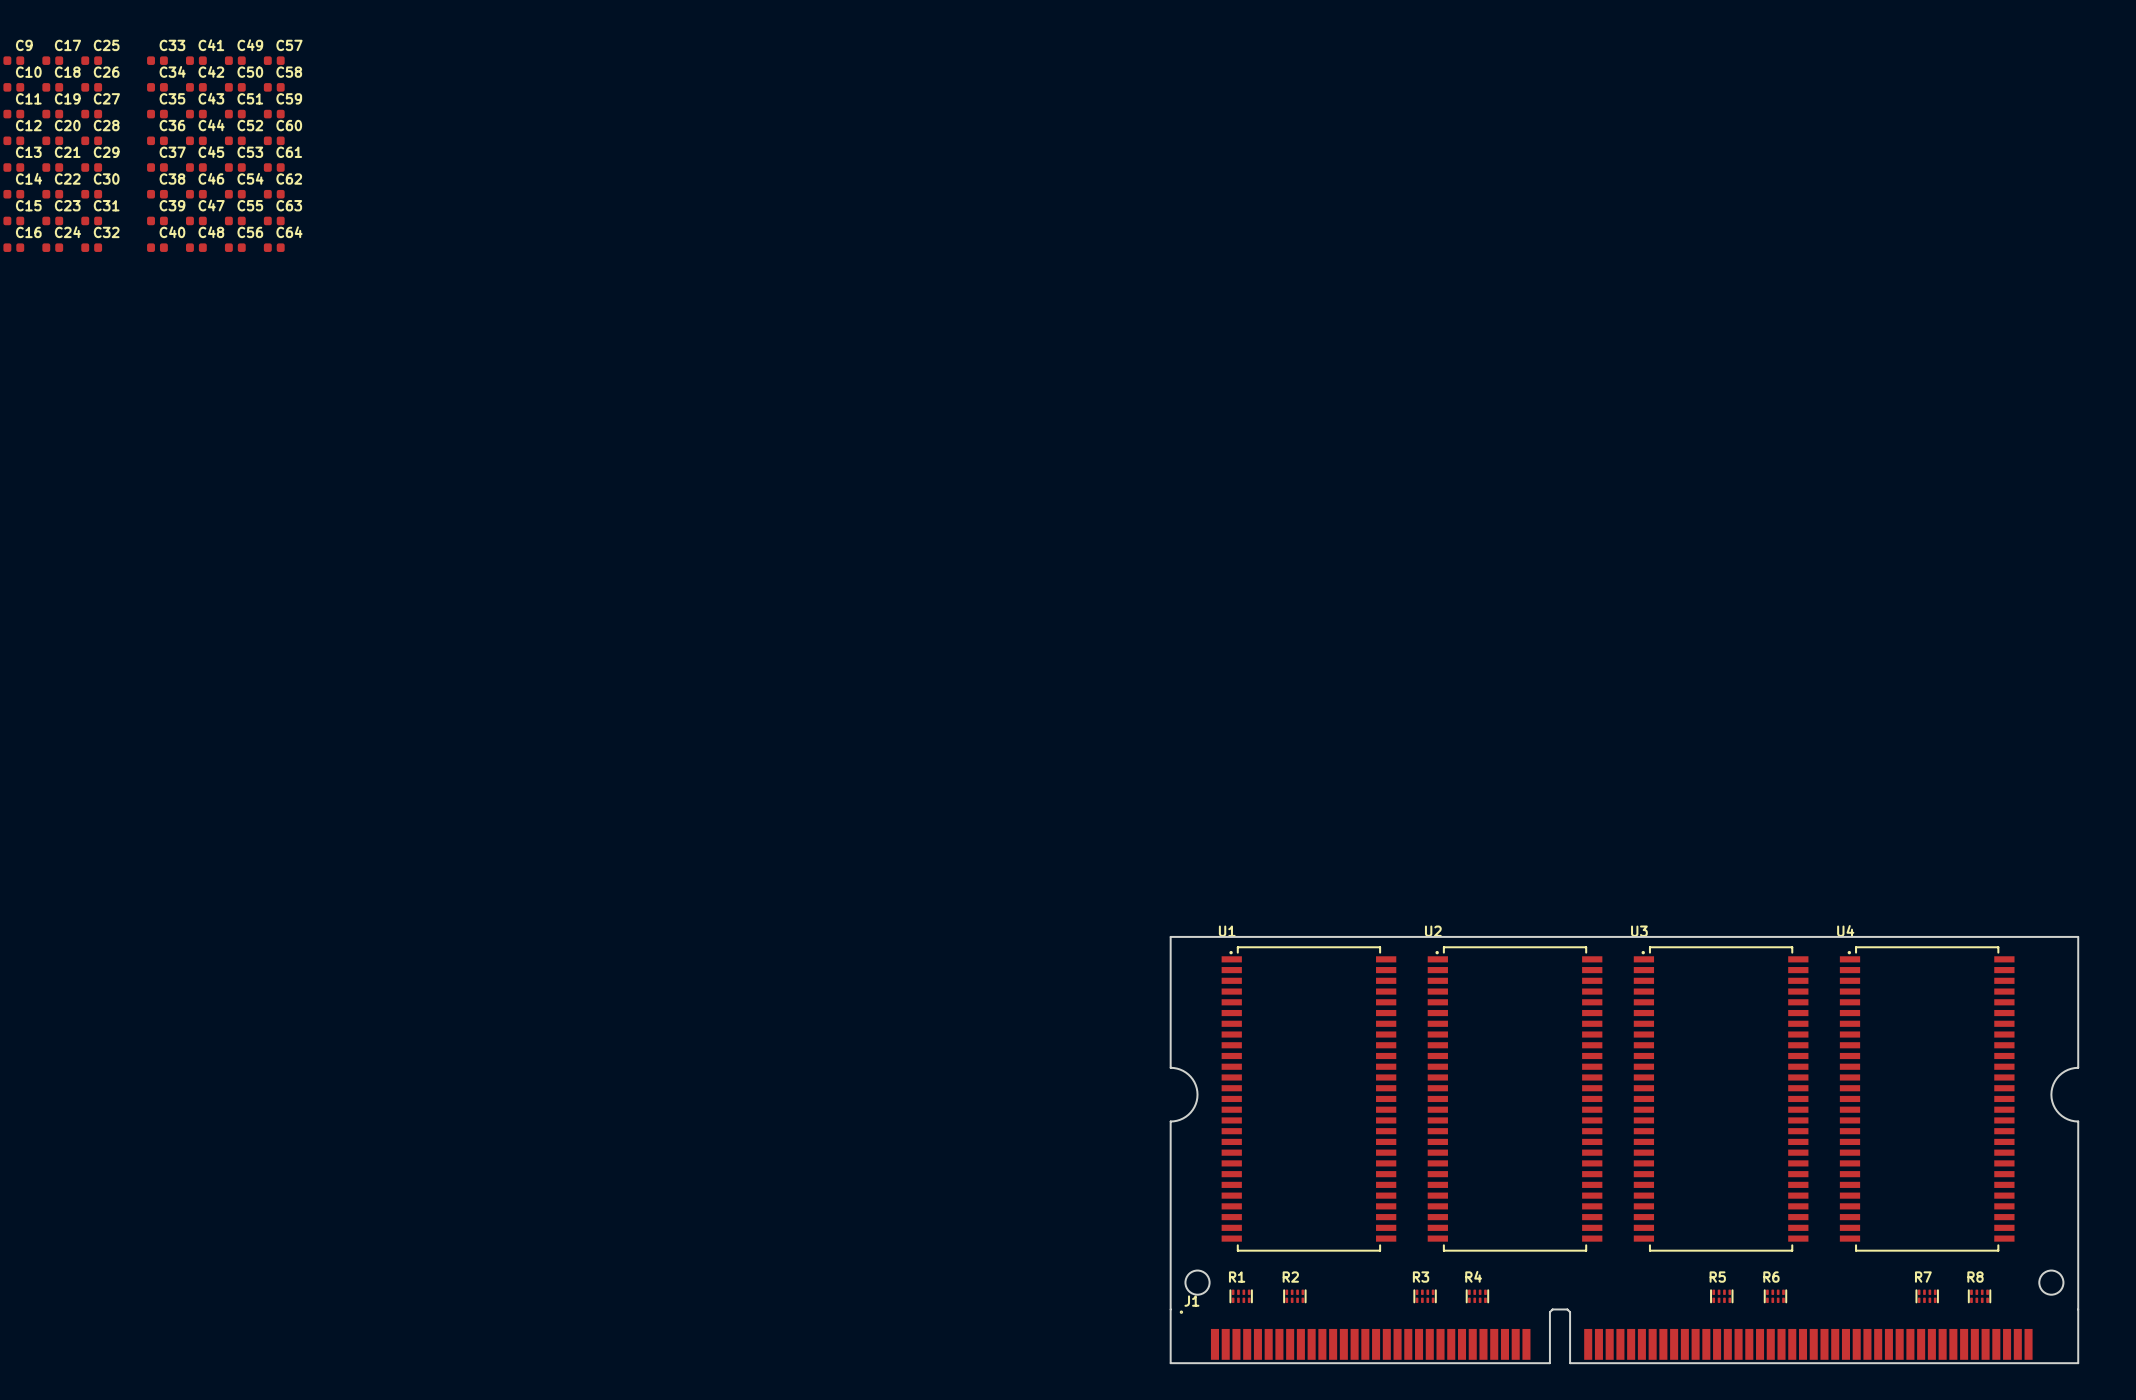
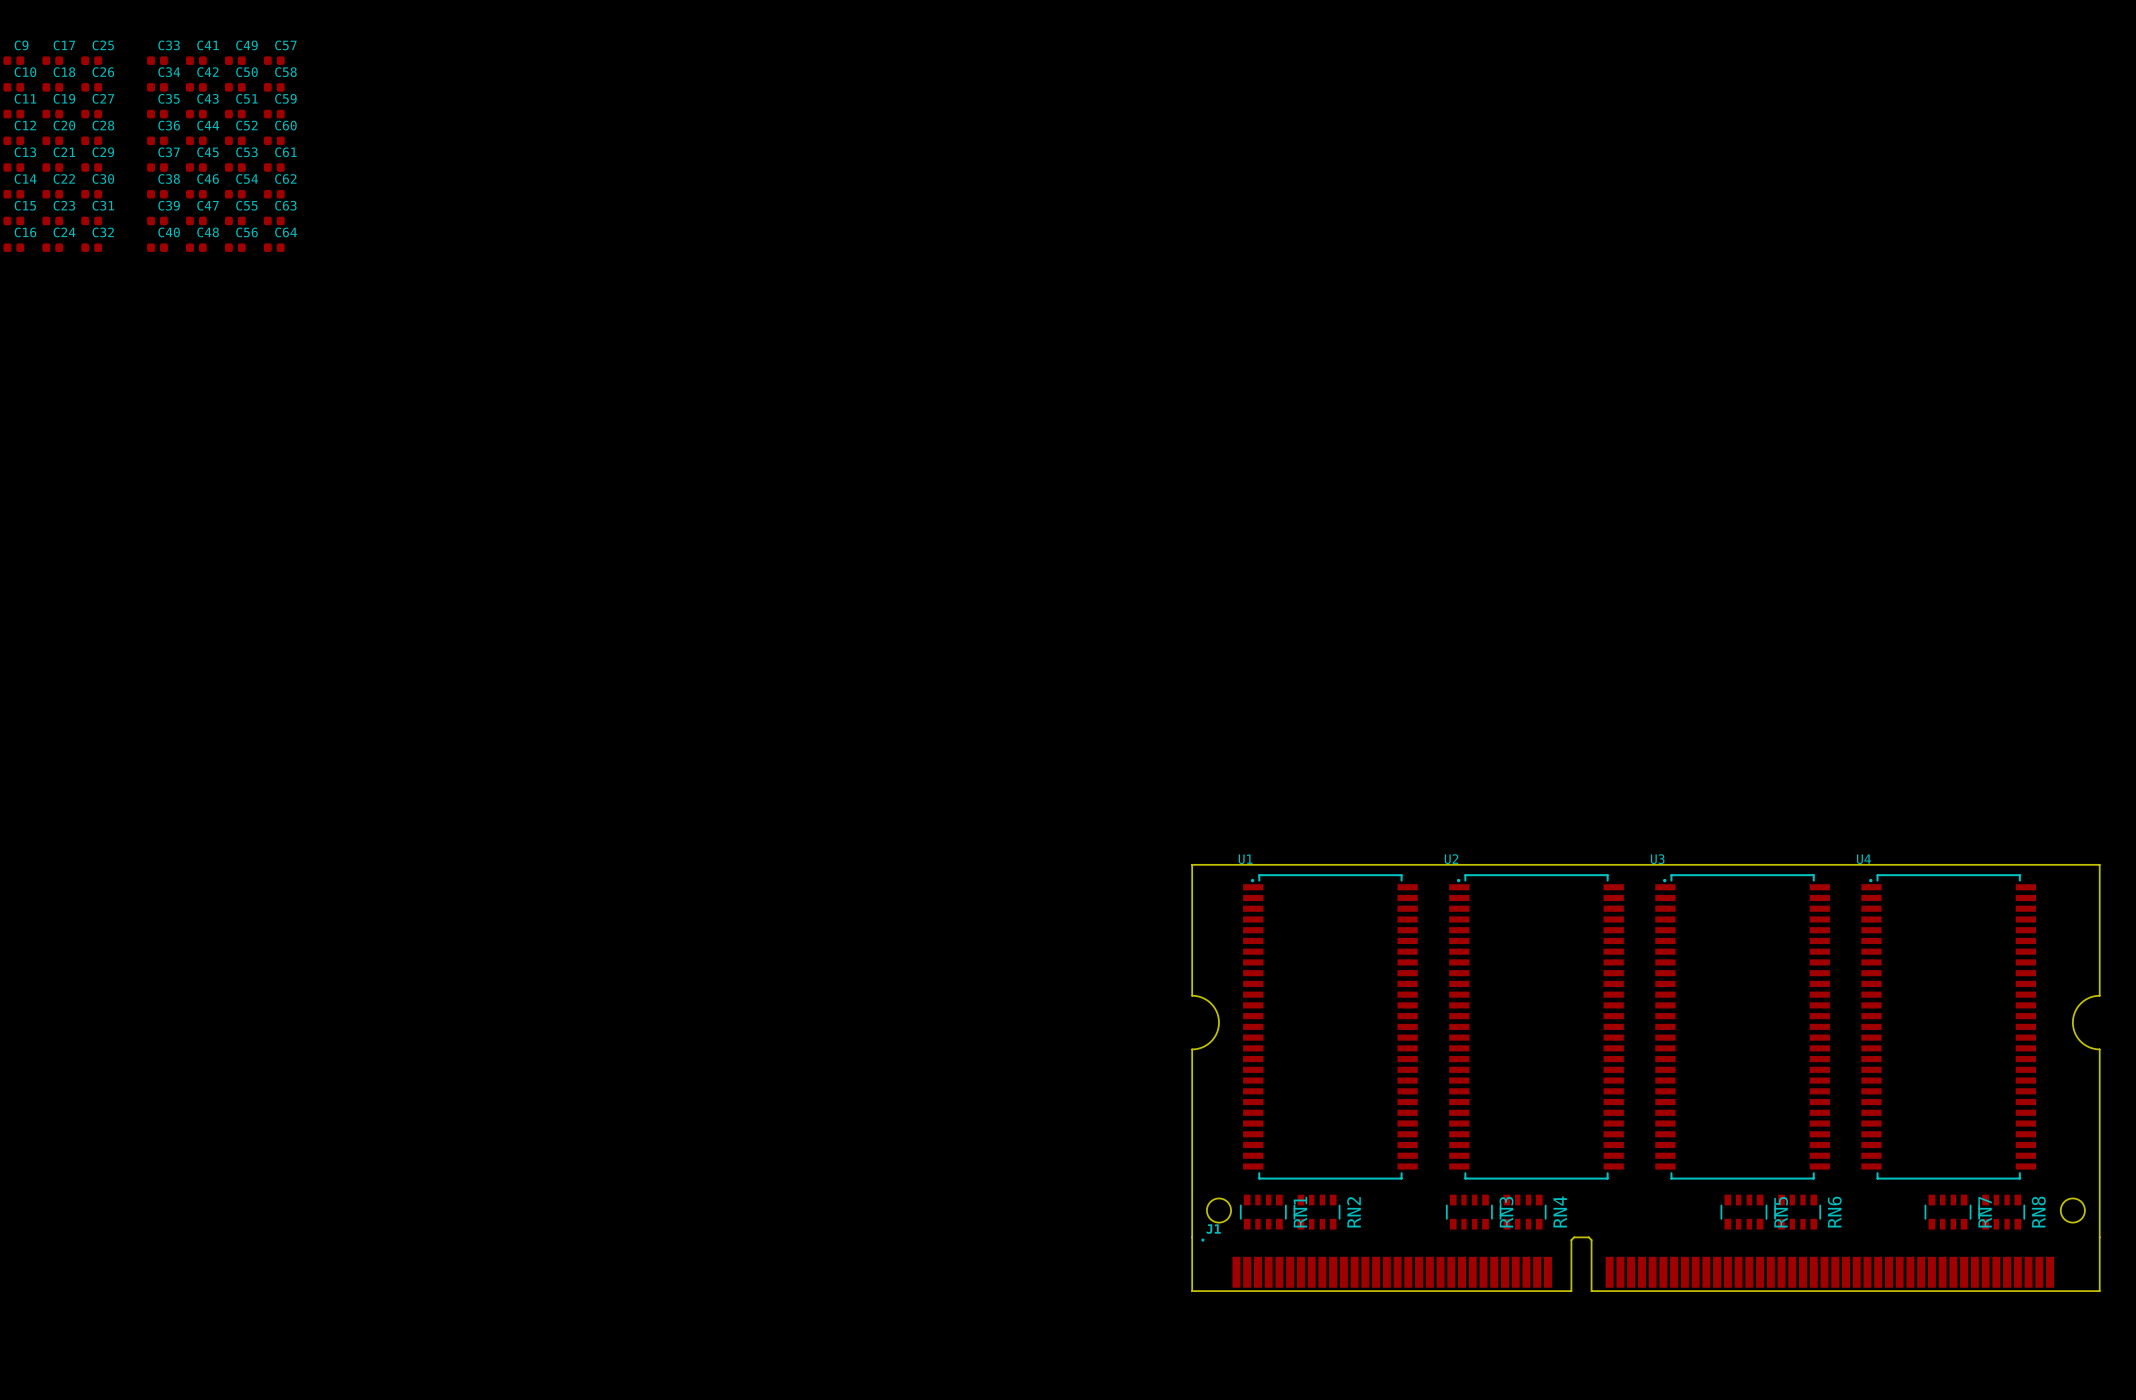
U1 position: (1308, 1098) -> (1330, 1026)
U2 position: (1515, 1098) -> (1536, 1026)
U3 position: (1721, 1098) -> (1742, 1026)
U4 position: (1927, 1098) -> (1948, 1026)
RN1: none -> (1263, 1212)
RN2: none -> (1317, 1212)
RN3: none -> (1469, 1212)
RN4: none -> (1523, 1212)
RN5: none -> (1743, 1212)
RN6: none -> (1797, 1212)
RN7: none -> (1948, 1212)
RN8: none -> (2001, 1212)
R1: (1241, 1296) -> none
R2: (1294, 1296) -> none
R3: (1425, 1296) -> none
R4: (1477, 1296) -> none
R5: (1721, 1296) -> none
R6: (1775, 1296) -> none
R7: (1927, 1296) -> none
R8: (1979, 1296) -> none
board edge: (1170, 1309) (1170, 1121) (1180, 1119) (1188, 1114) (1194, 1107) (1197, 1094) (1195, 1085) (1190, 1076) (1183, 1070) (1170, 1067) (1170, 936) (2078, 936) (2078, 1067) (2067, 1069) (2059, 1075) (2053, 1084) (2051, 1094) (2053, 1104) (2059, 1113) (2067, 1119) (2078, 1121) (2078, 1309) -> (1192, 1237) (1192, 1049) (1204, 1046) (1212, 1040) (1217, 1032) (1219, 1022) (1215, 1010) (1209, 1002) (1201, 997) (1192, 995) (1192, 864) (2099, 864) (2099, 995) (2089, 997) (2080, 1003) (2074, 1012) (2072, 1022) (2074, 1032) (2080, 1041) (2089, 1047) (2099, 1049) (2099, 1237)
J1 position: (1624, 1317) -> (1645, 1244)

